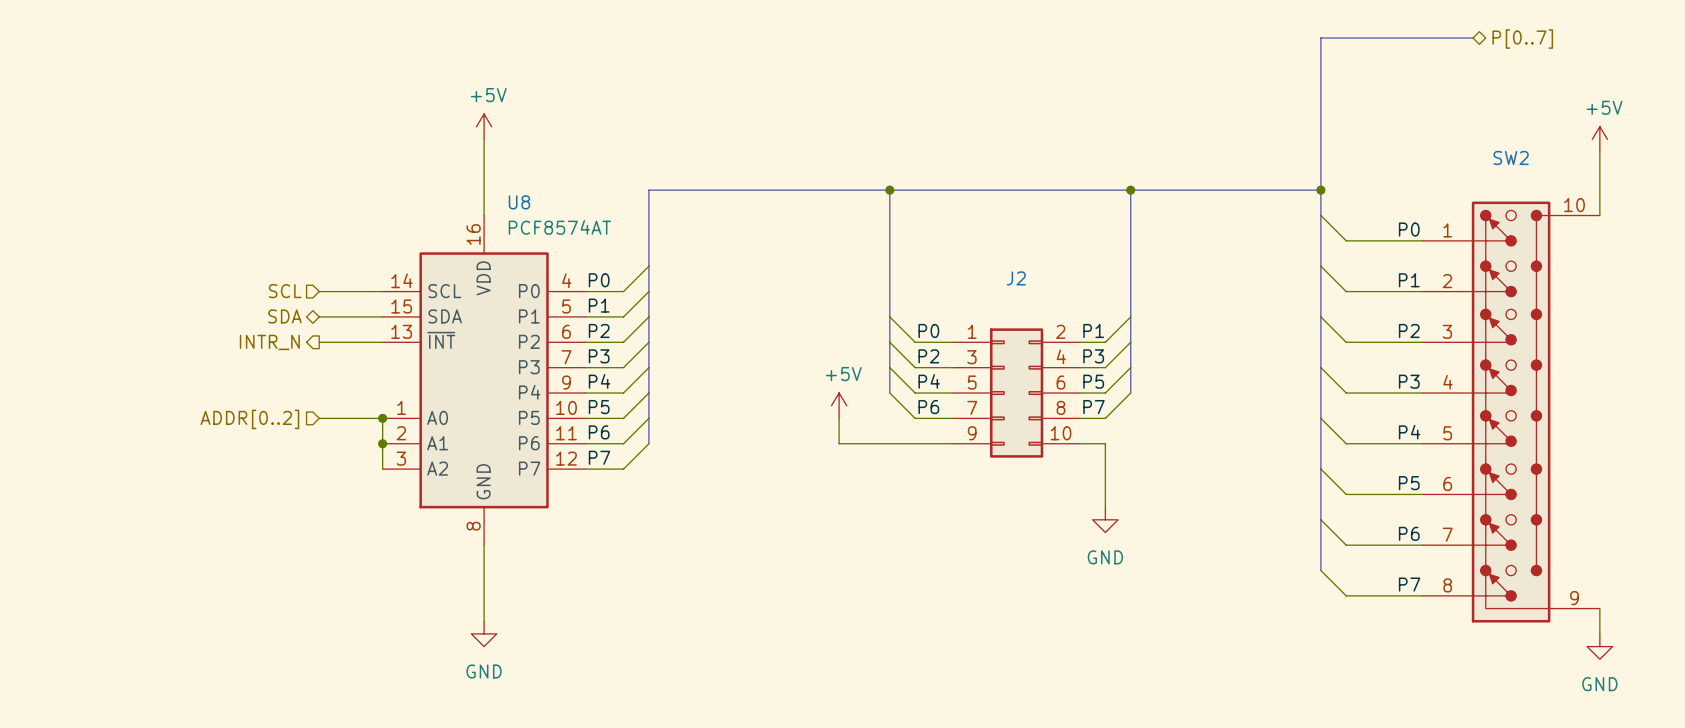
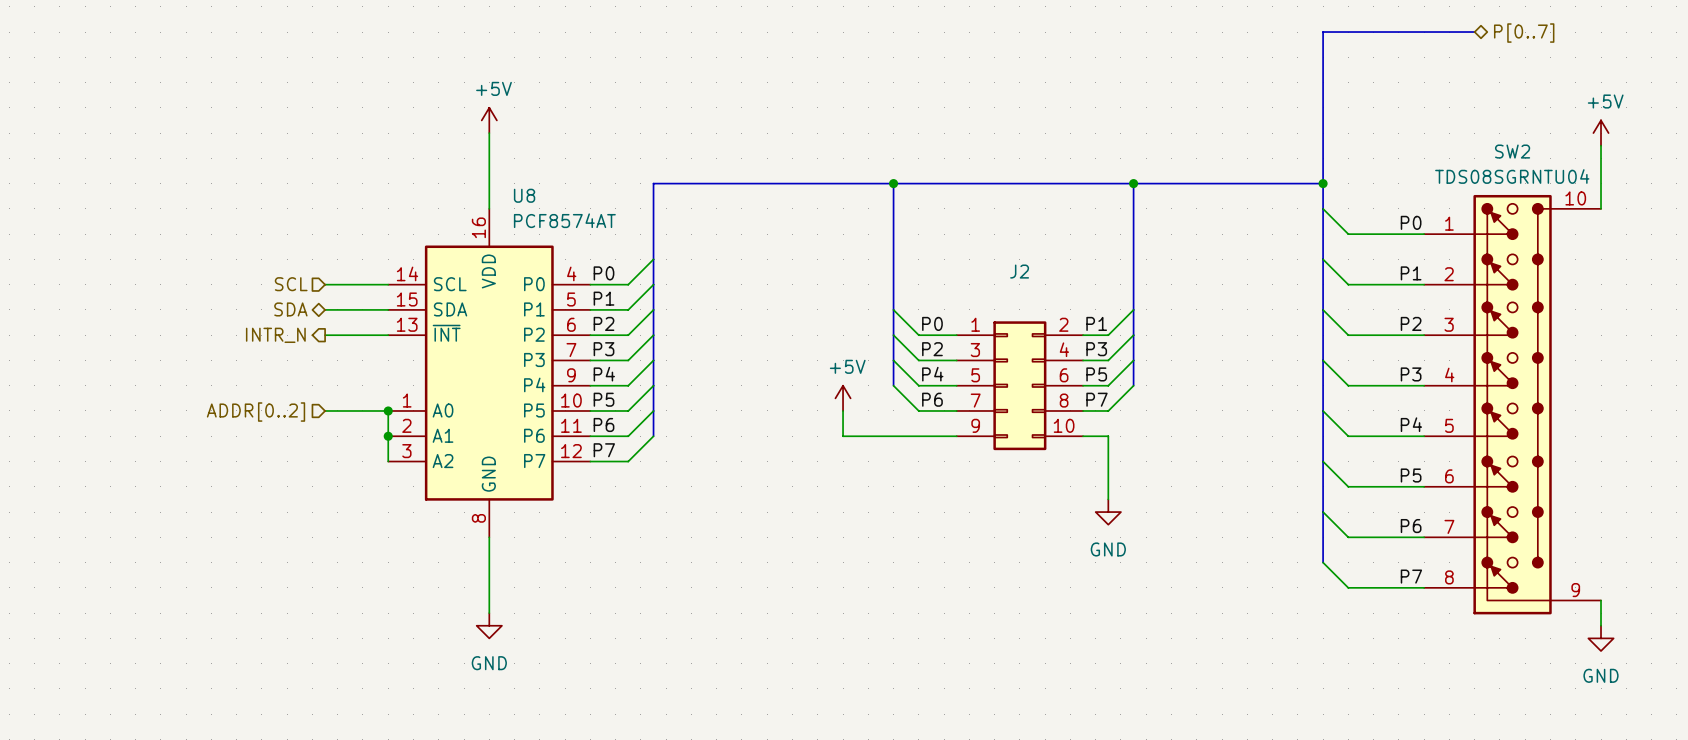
SW2 value: none -> TDS08SGRNTU04 (1512, 176)

